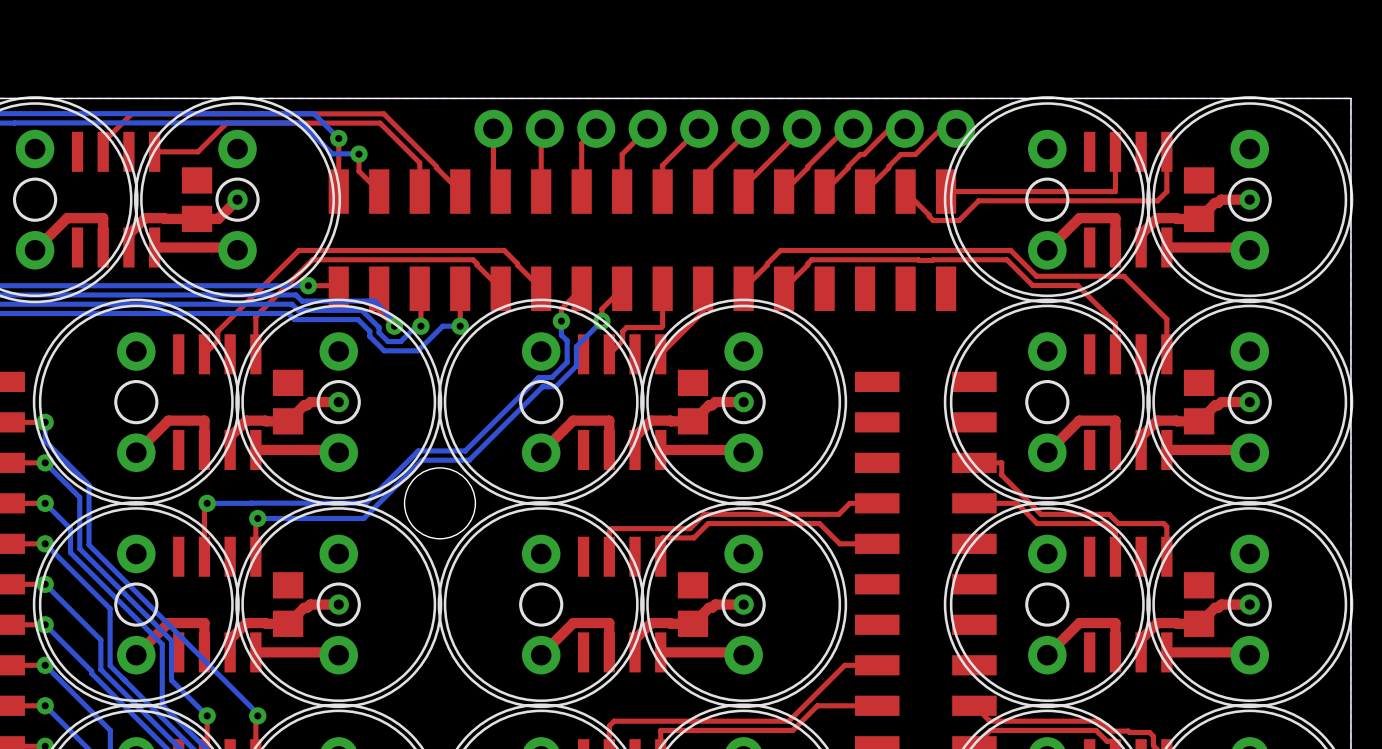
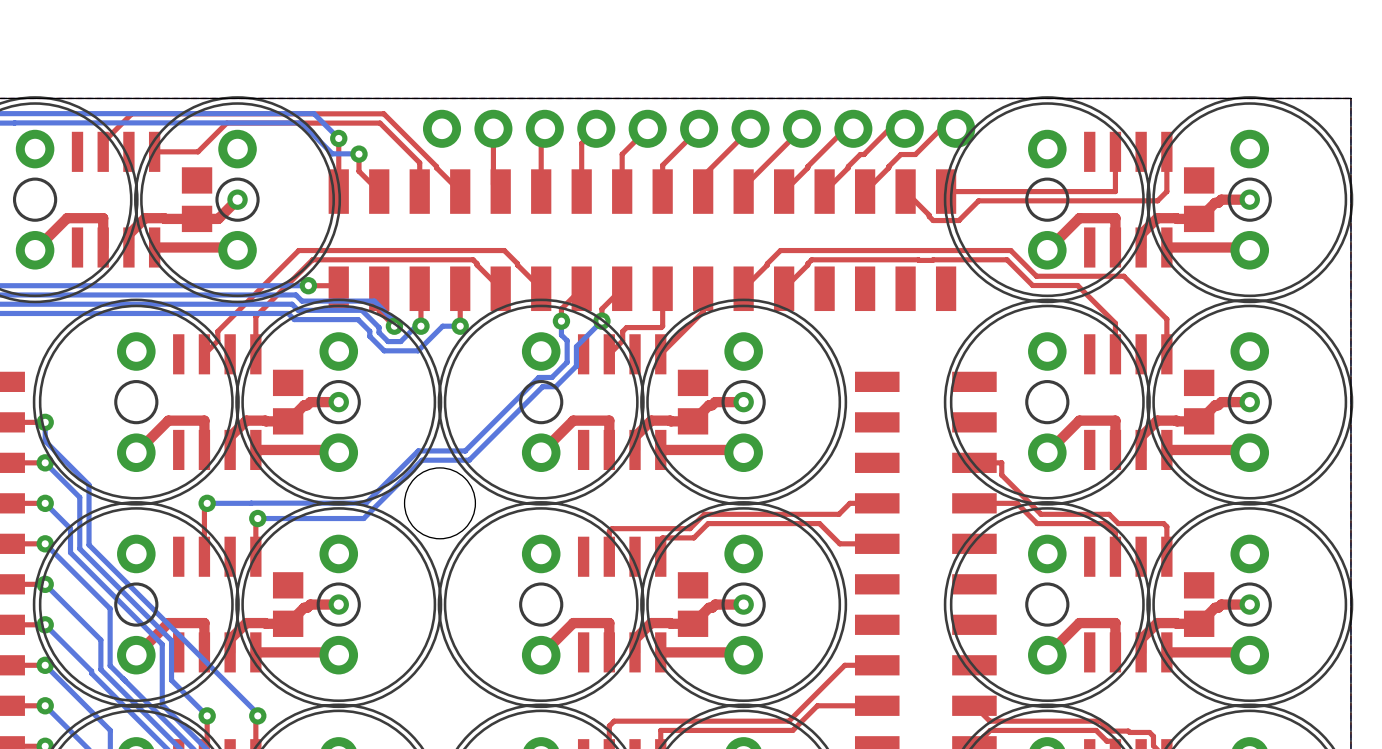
part: none -> (699, 128)

